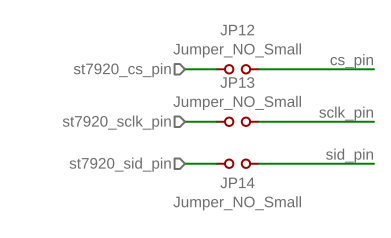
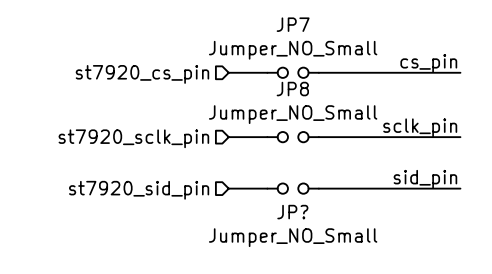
JP12 name: JP12 (237, 30) -> JP7 (293, 24)
JP13 name: JP13 (237, 82) -> JP8 (292, 89)
JP14 name: JP14 (237, 182) -> JP? (292, 212)

